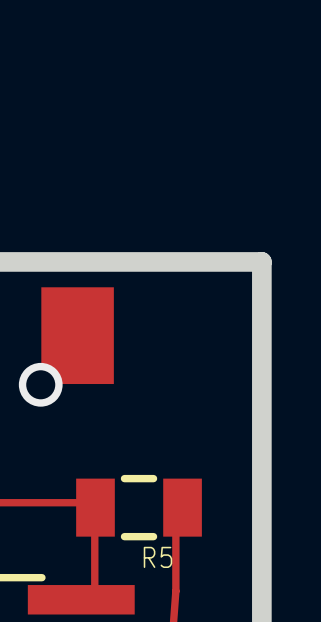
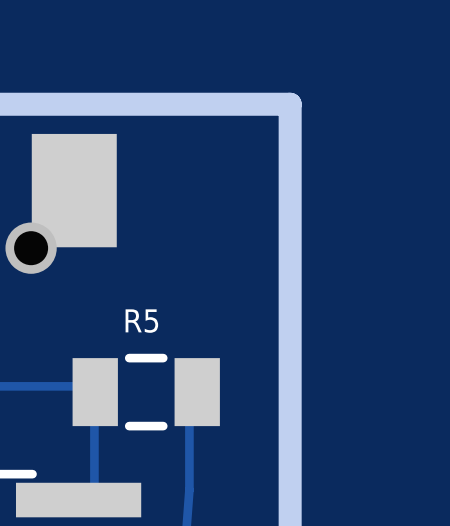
R5 name position: R5 (157, 557) -> R5 (141, 321)

